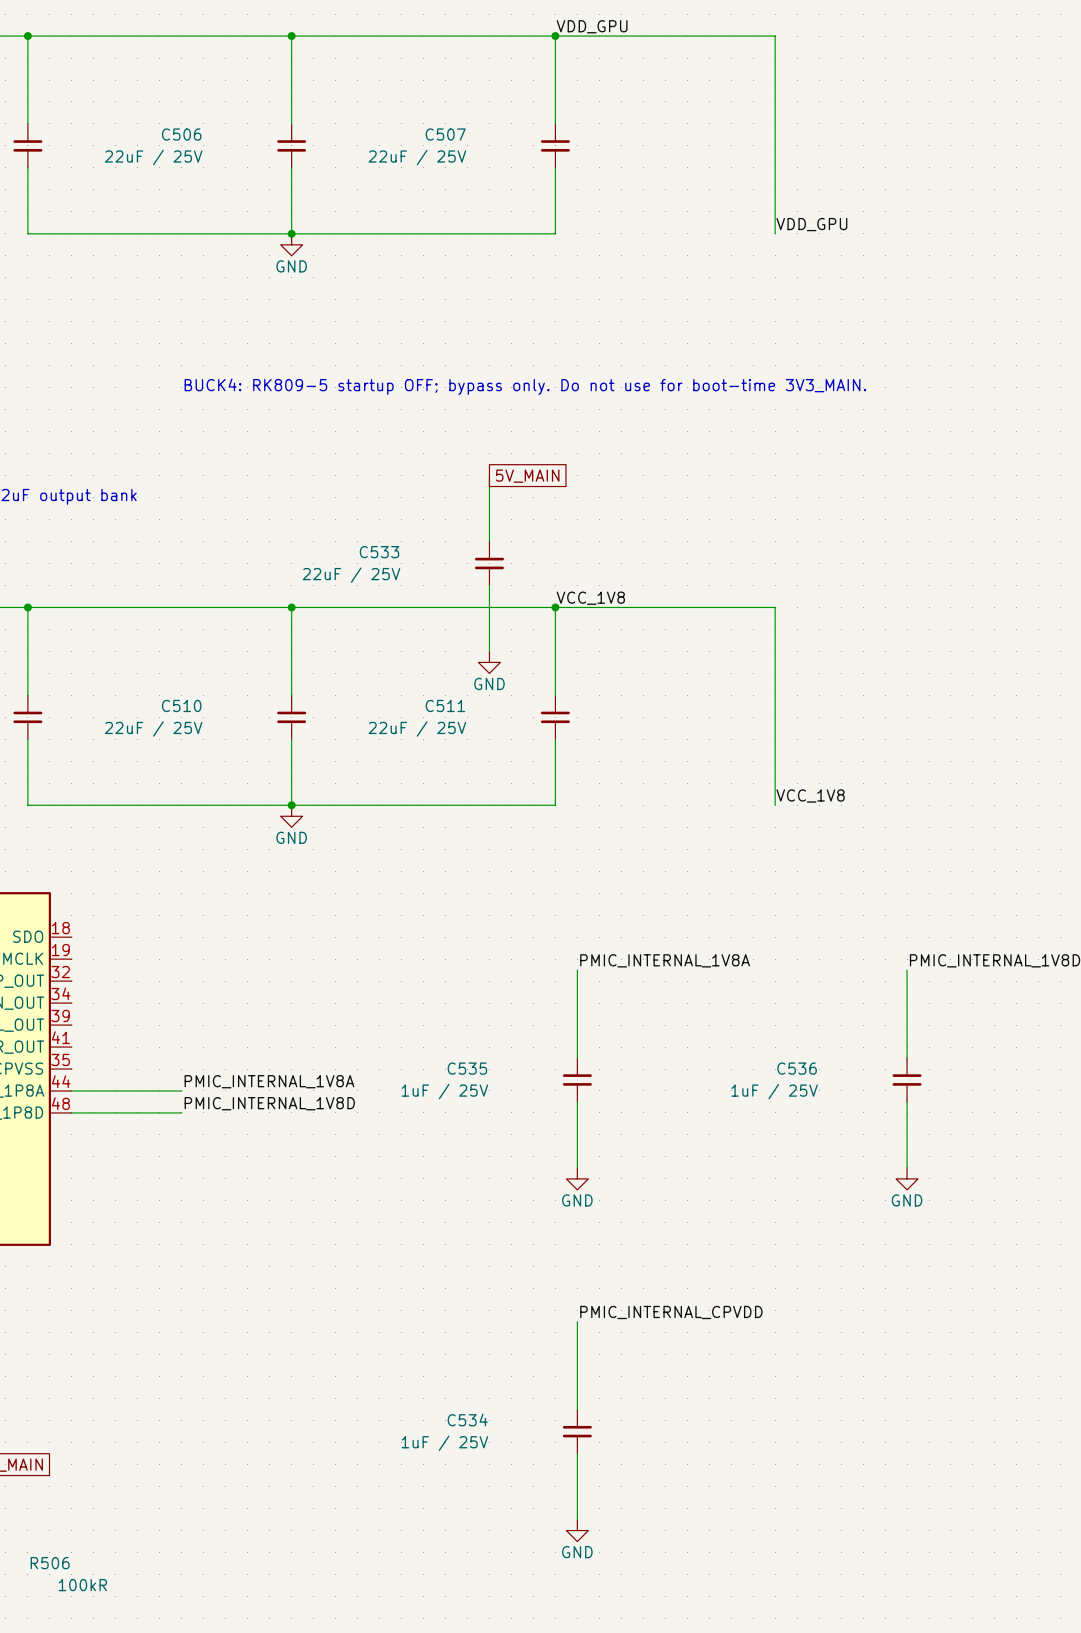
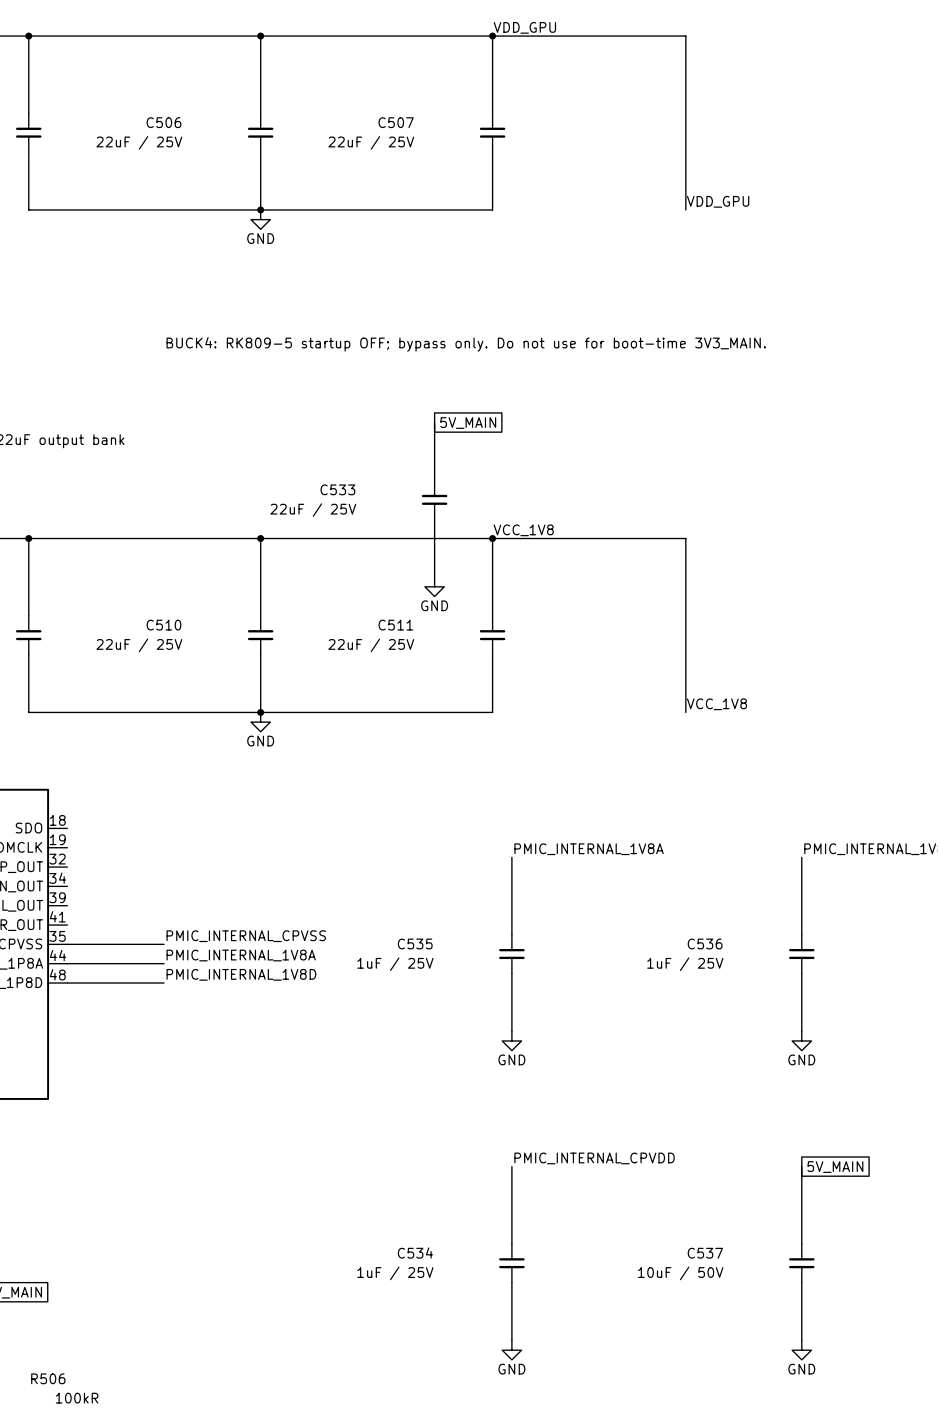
label: none -> PMIC_INTERNAL_CPVSS (246, 936)
wire: none -> (67, 944) (164, 944)
wire: none -> (801, 1166) (801, 1243)
global label: none -> 5V_MAIN (835, 1167)
C537: none -> 10uF / 50V (801, 1263)
wire: none -> (801, 1282) (801, 1340)
power symbol: none -> GND (801, 1350)

